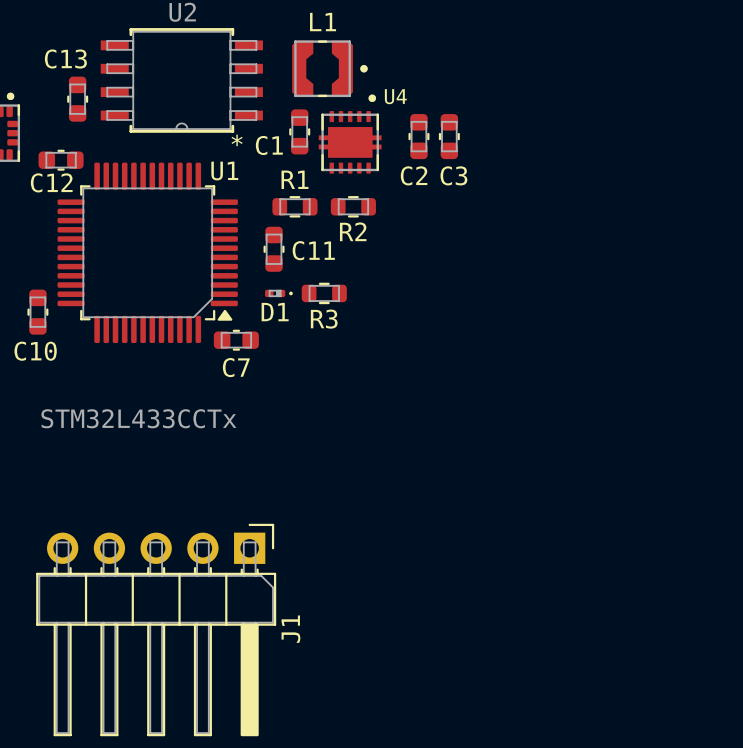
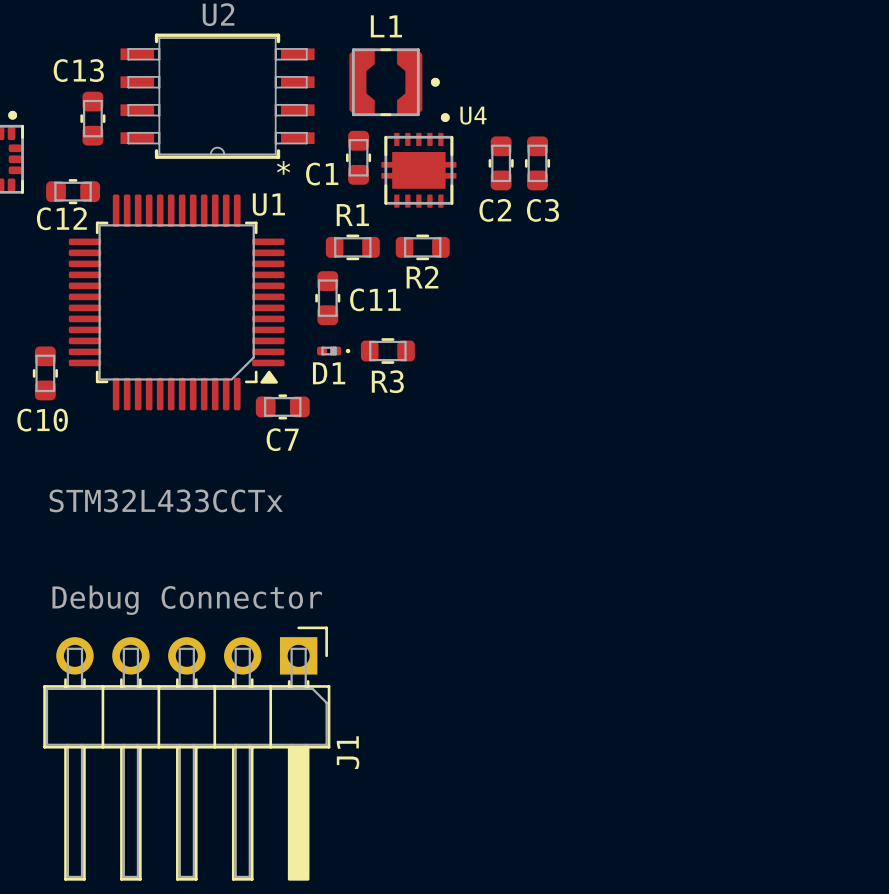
J1 value: none -> Debug Connector (187, 600)

